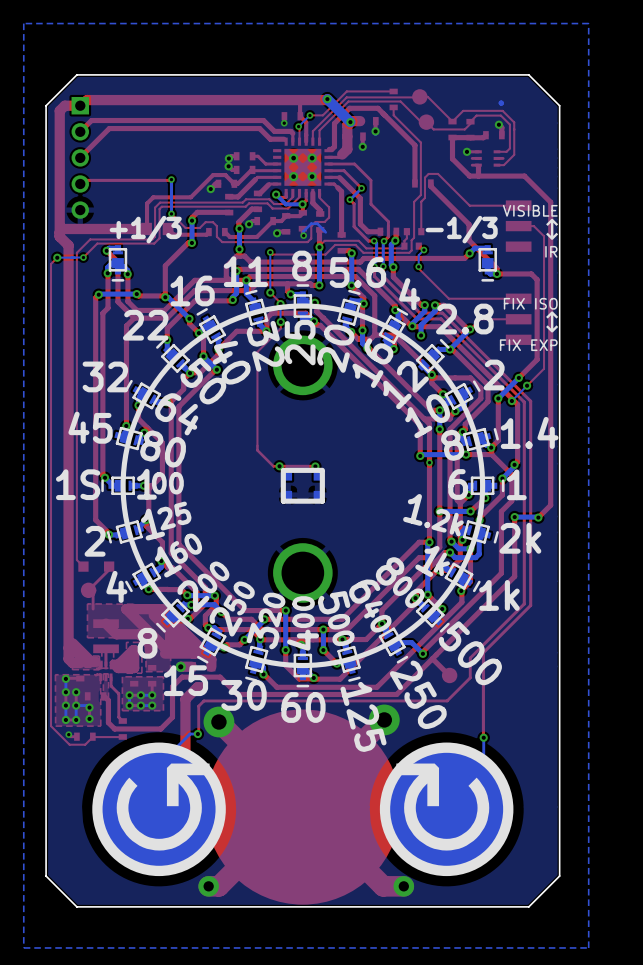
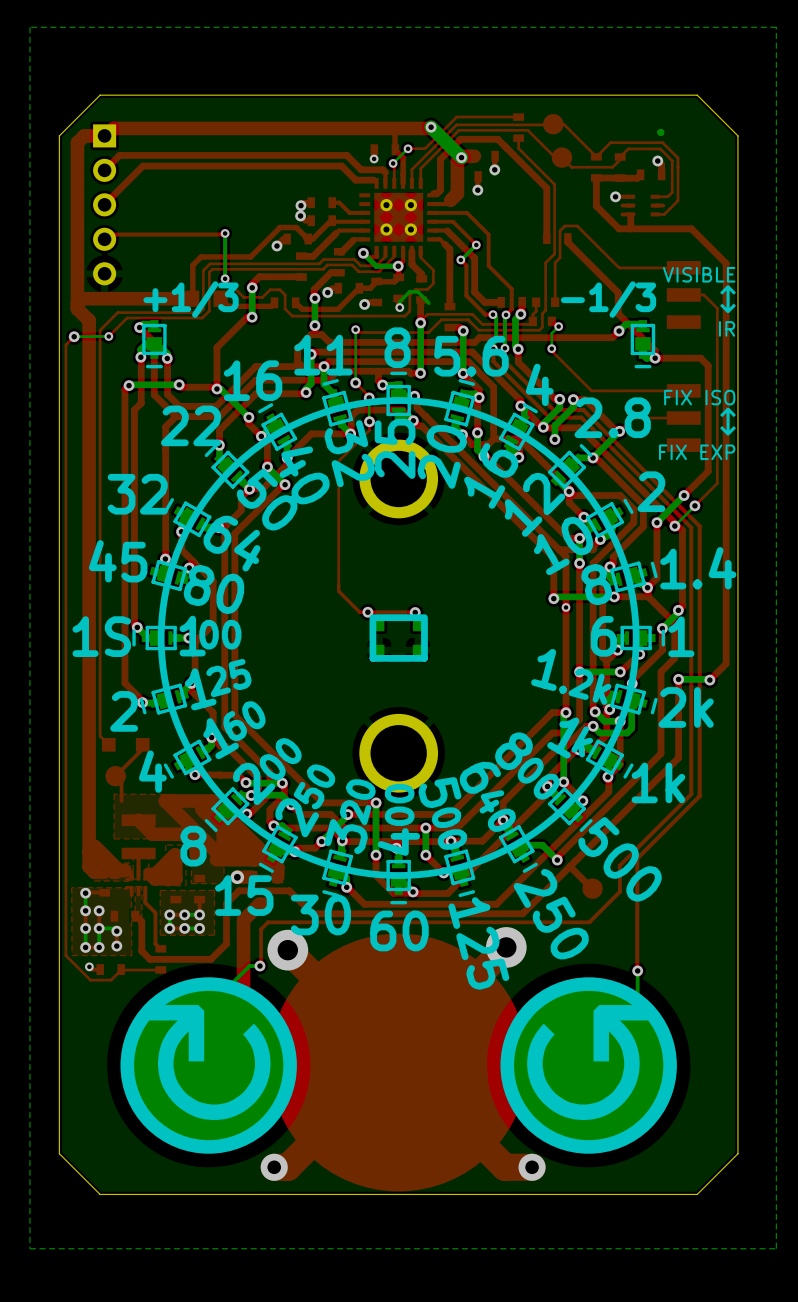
text: ↺ (163, 807) -> ↻ (209, 1062)
text: ↻ (442, 807) -> ↺ (588, 1062)

